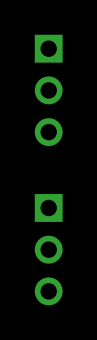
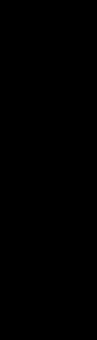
part: (48, 90) -> none
part: (48, 249) -> none

